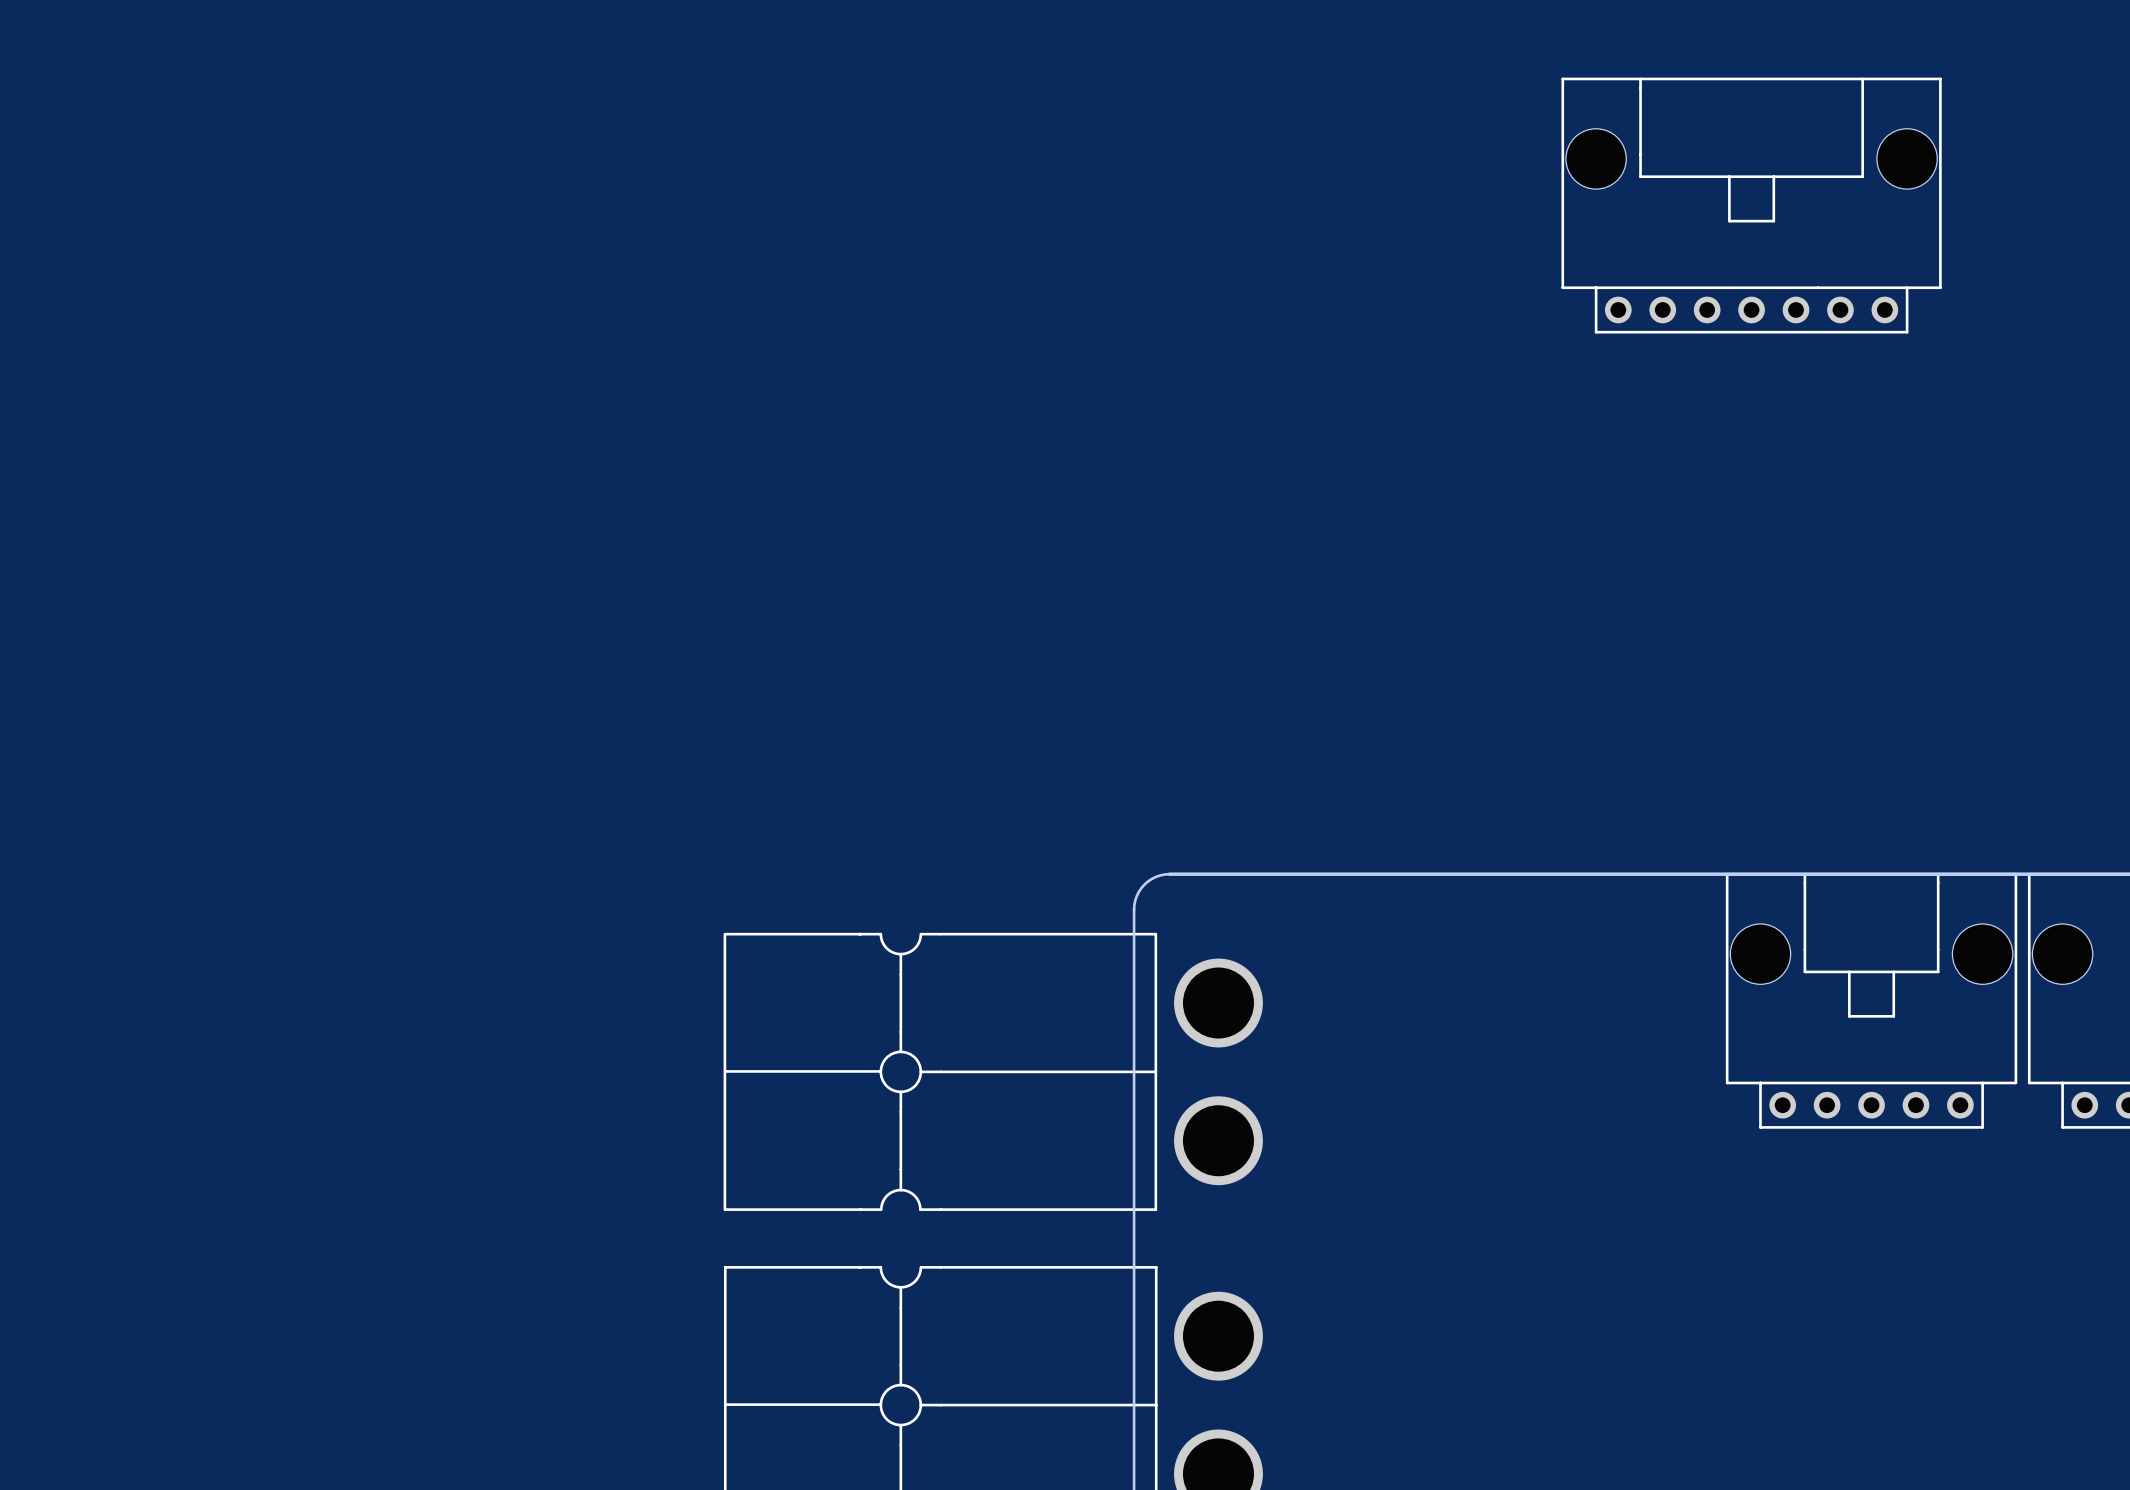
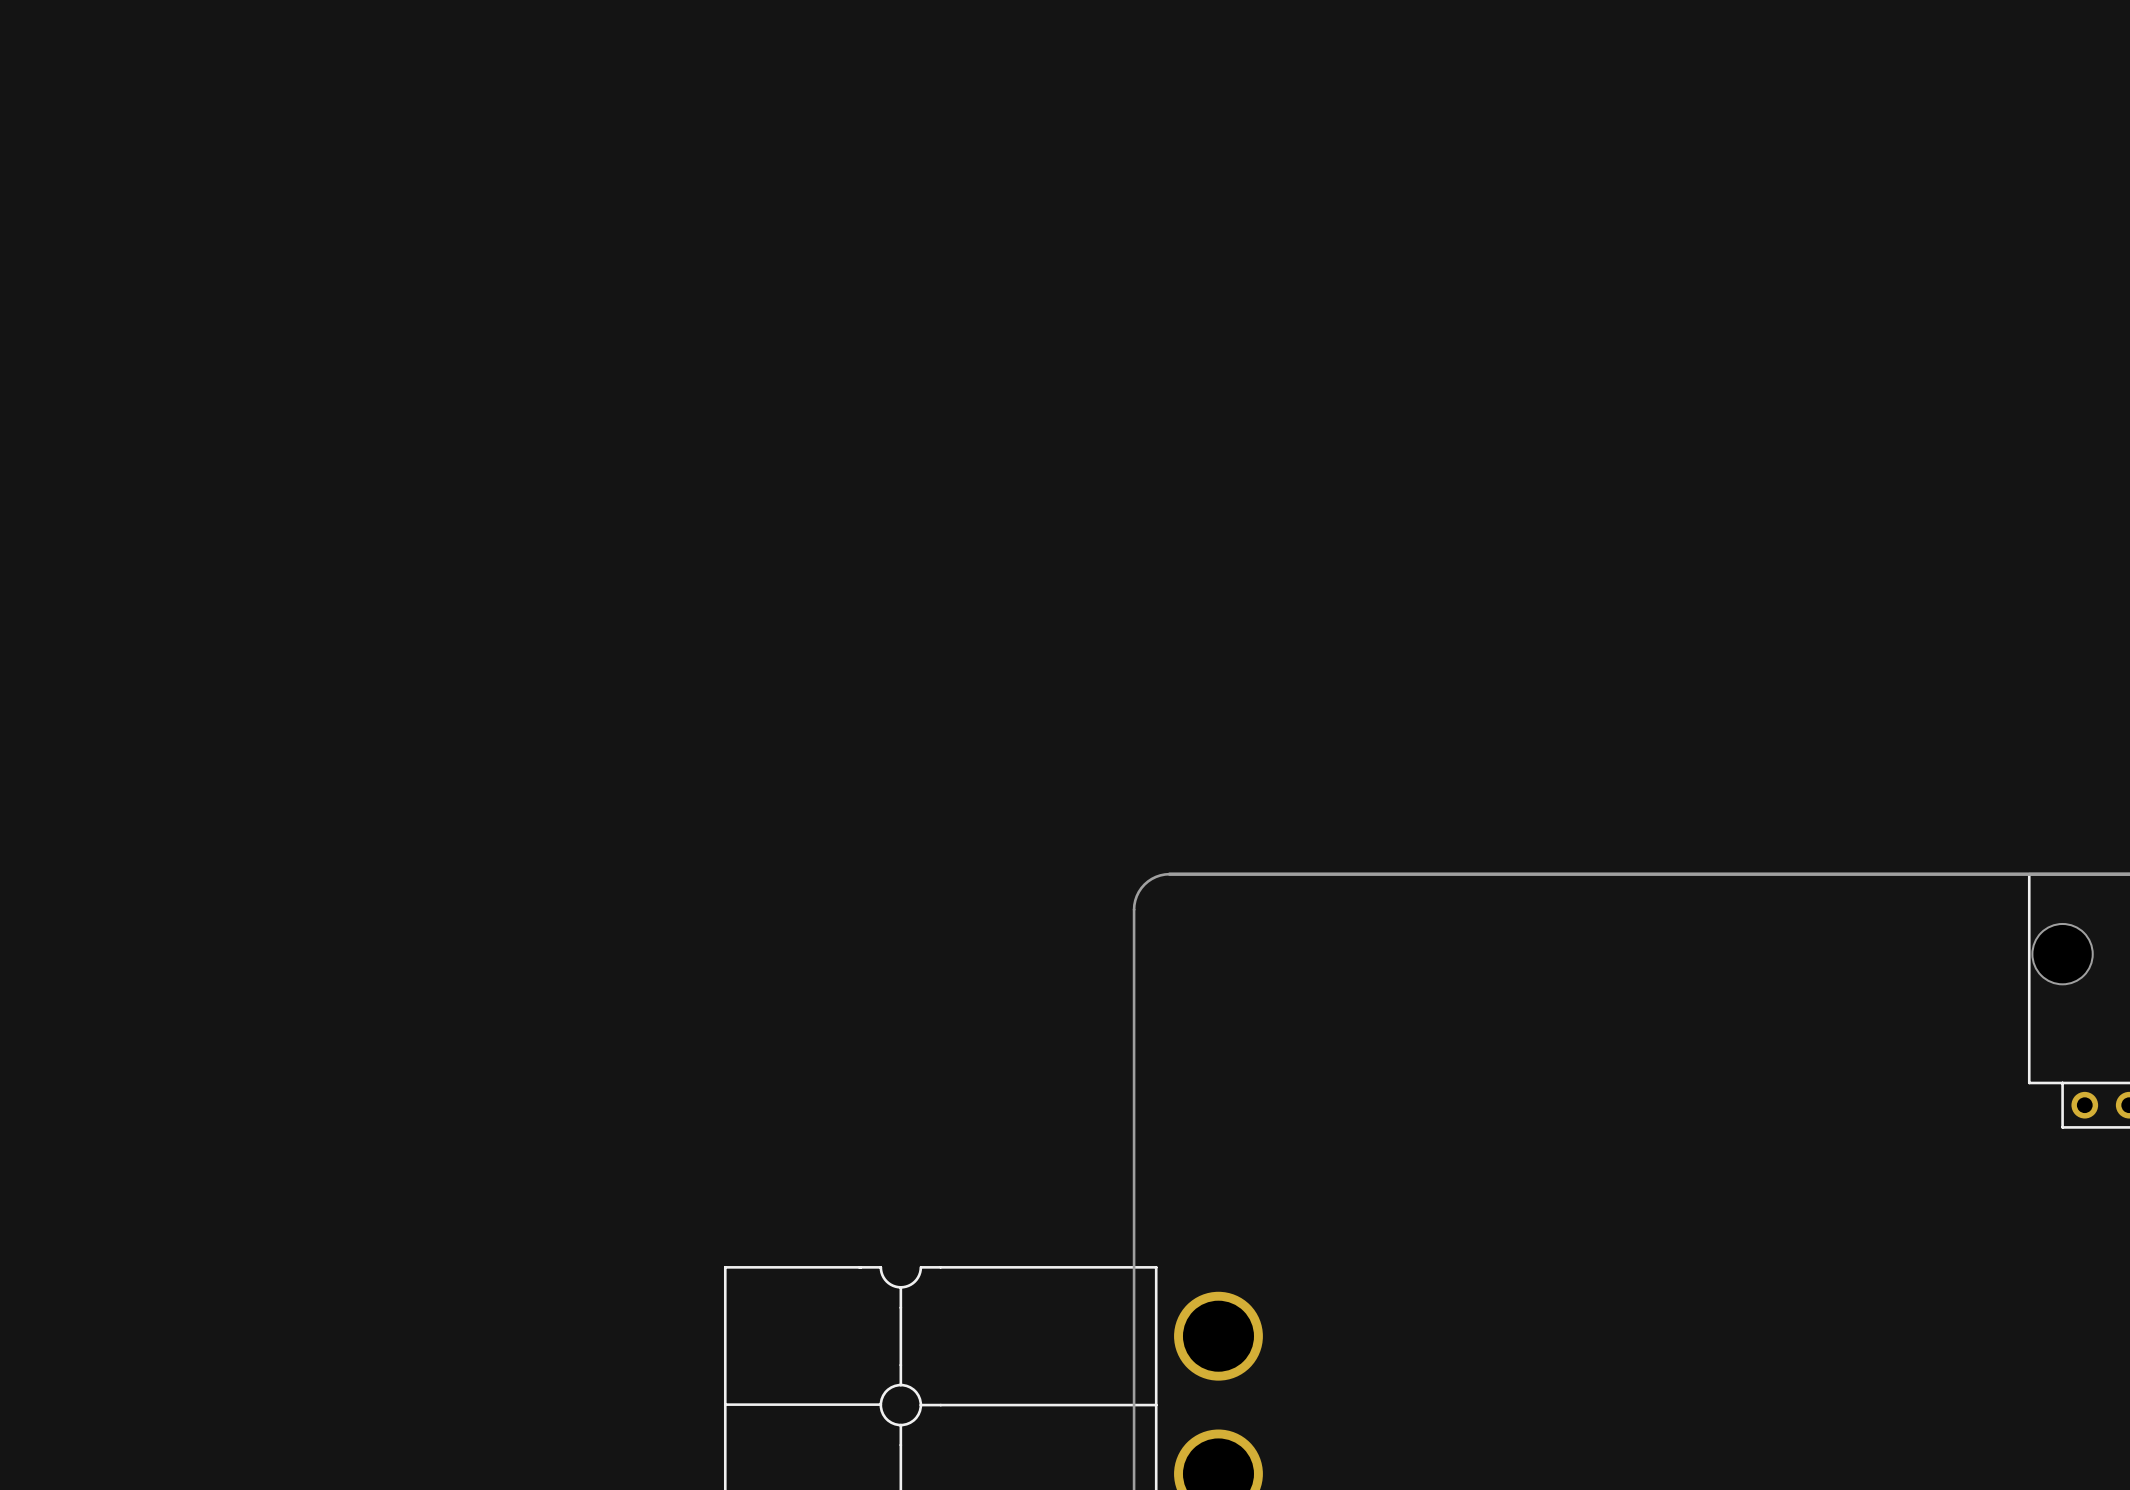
part: (1751, 205) -> none
part: (1871, 1000) -> none
part: (993, 1071) -> none

